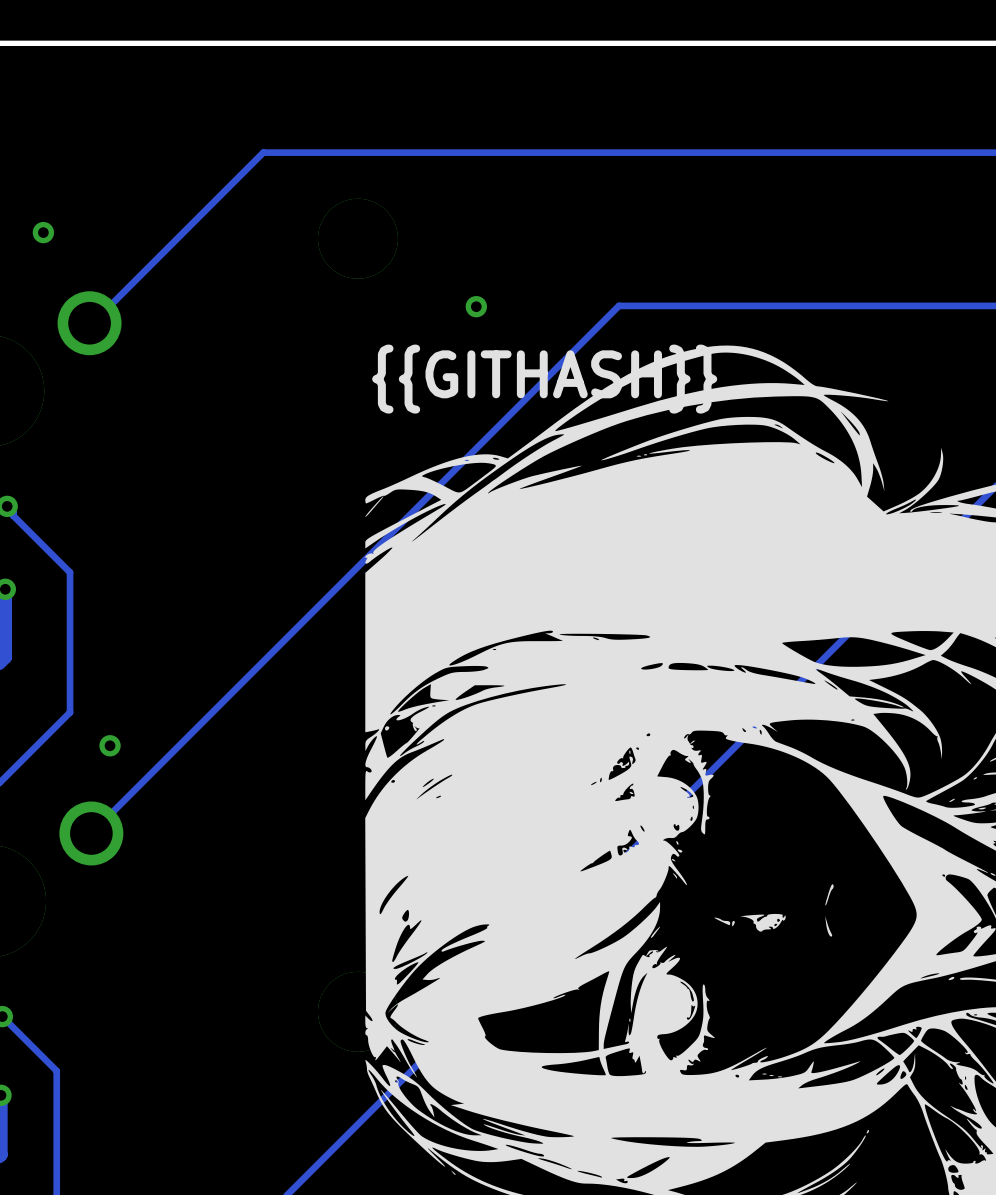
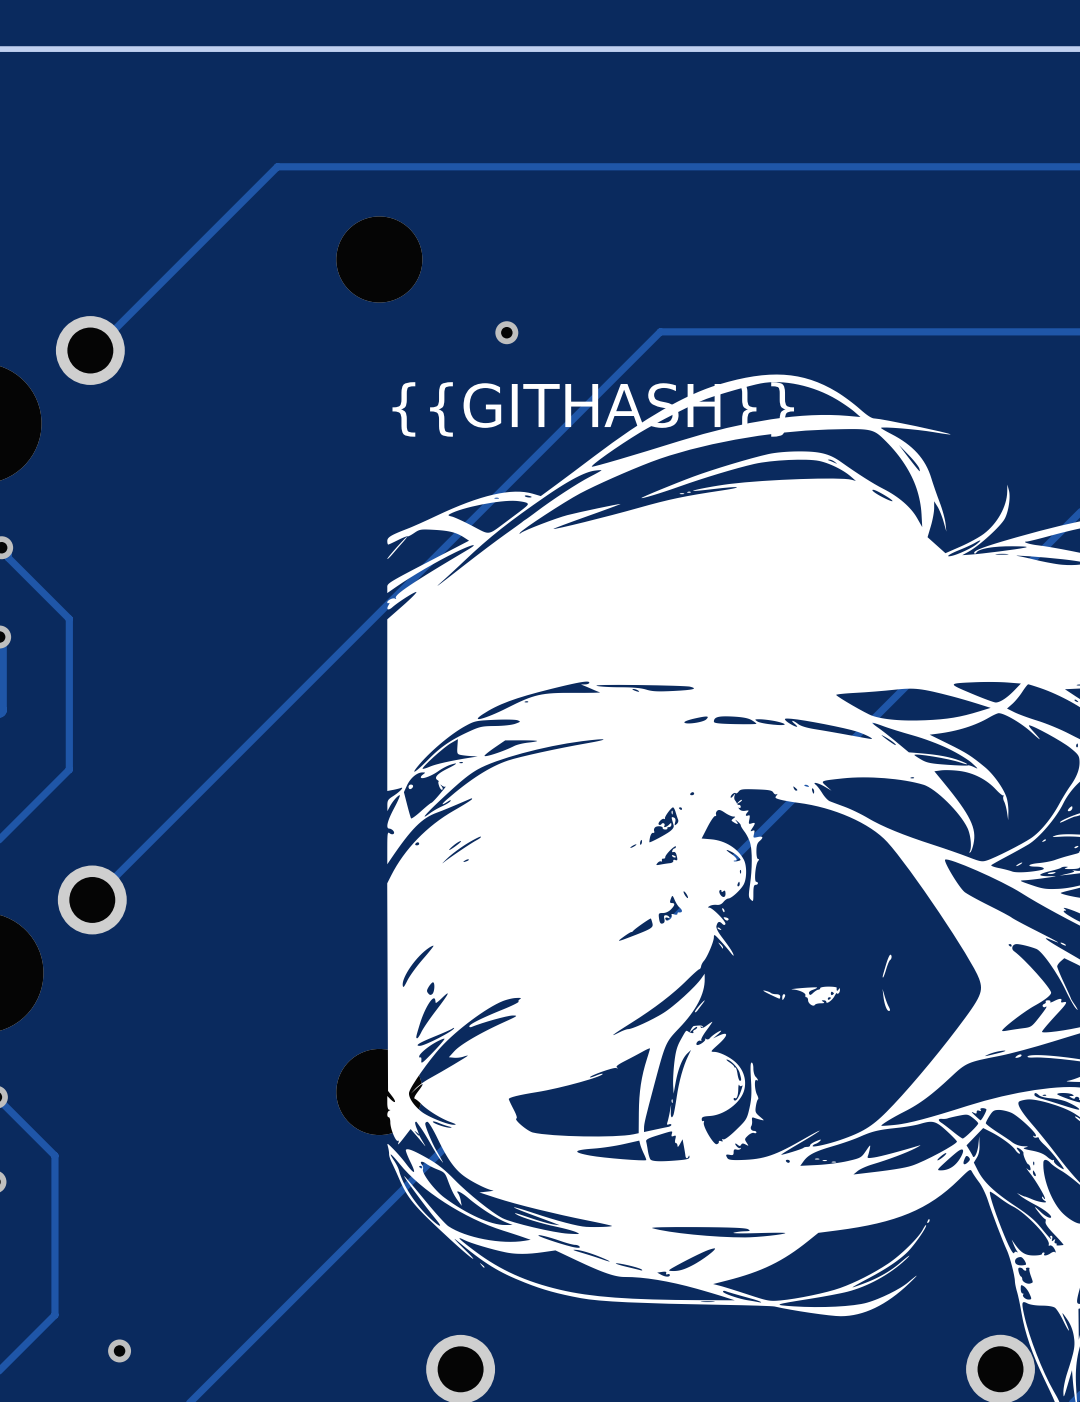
via: (43, 232) -> none
via: (110, 745) -> none

